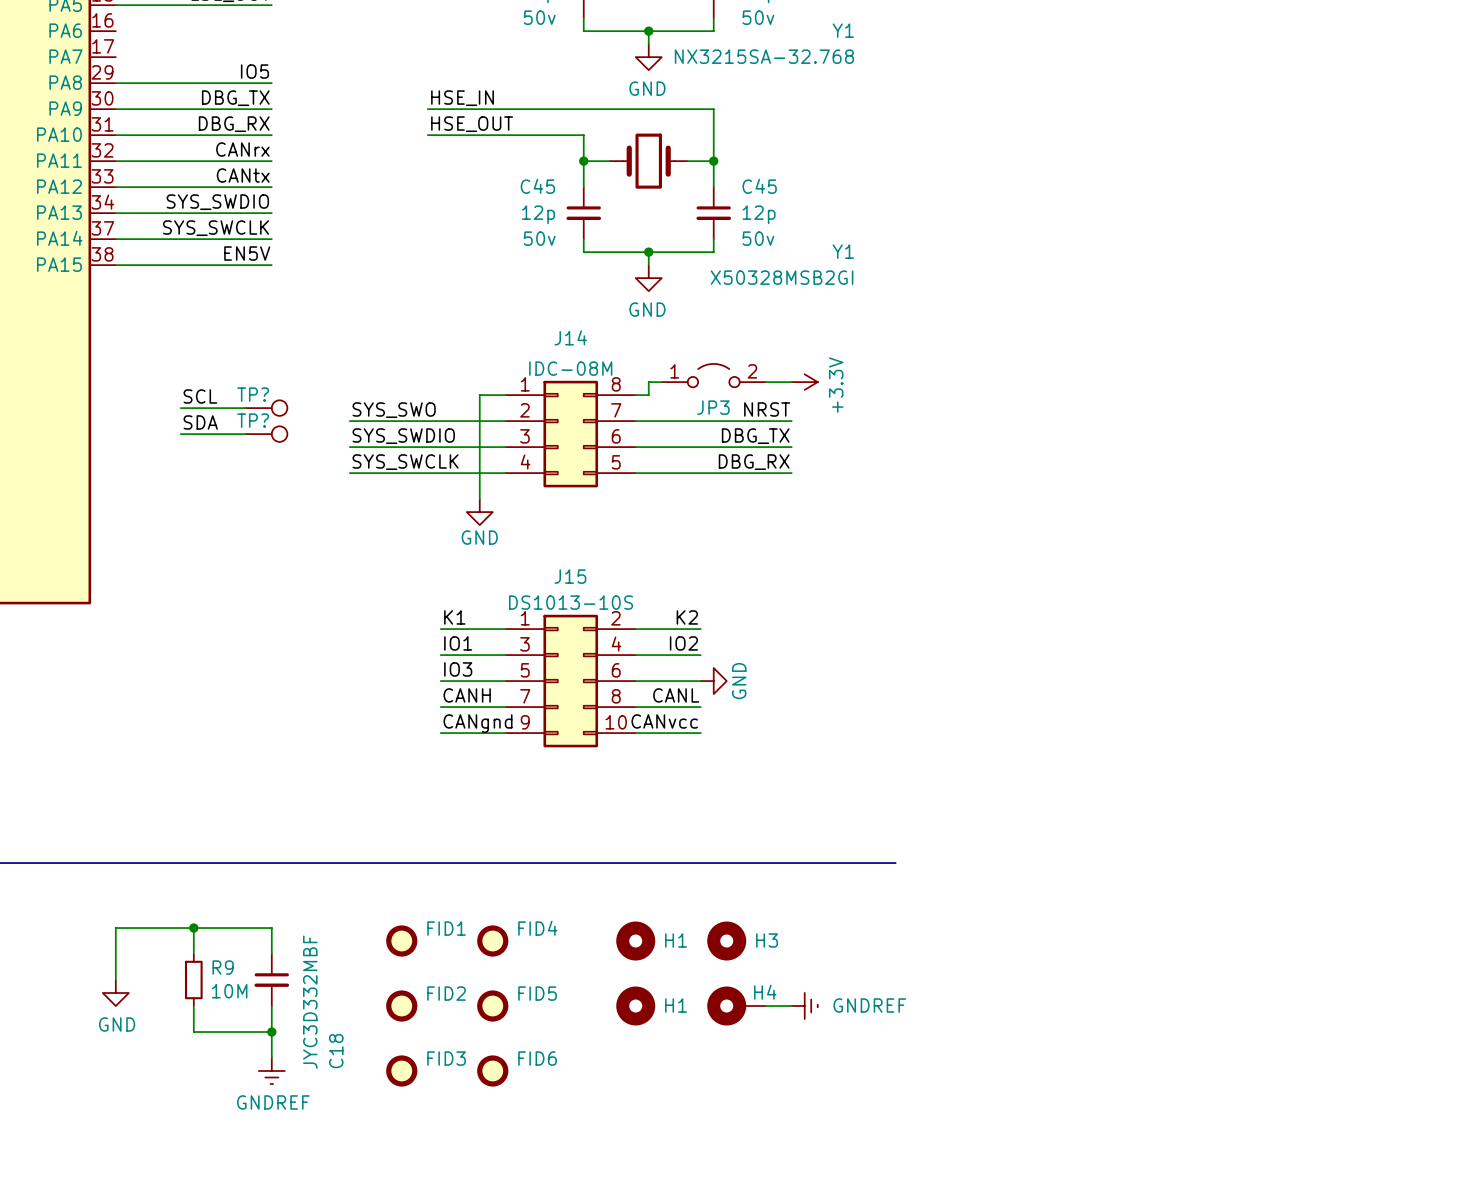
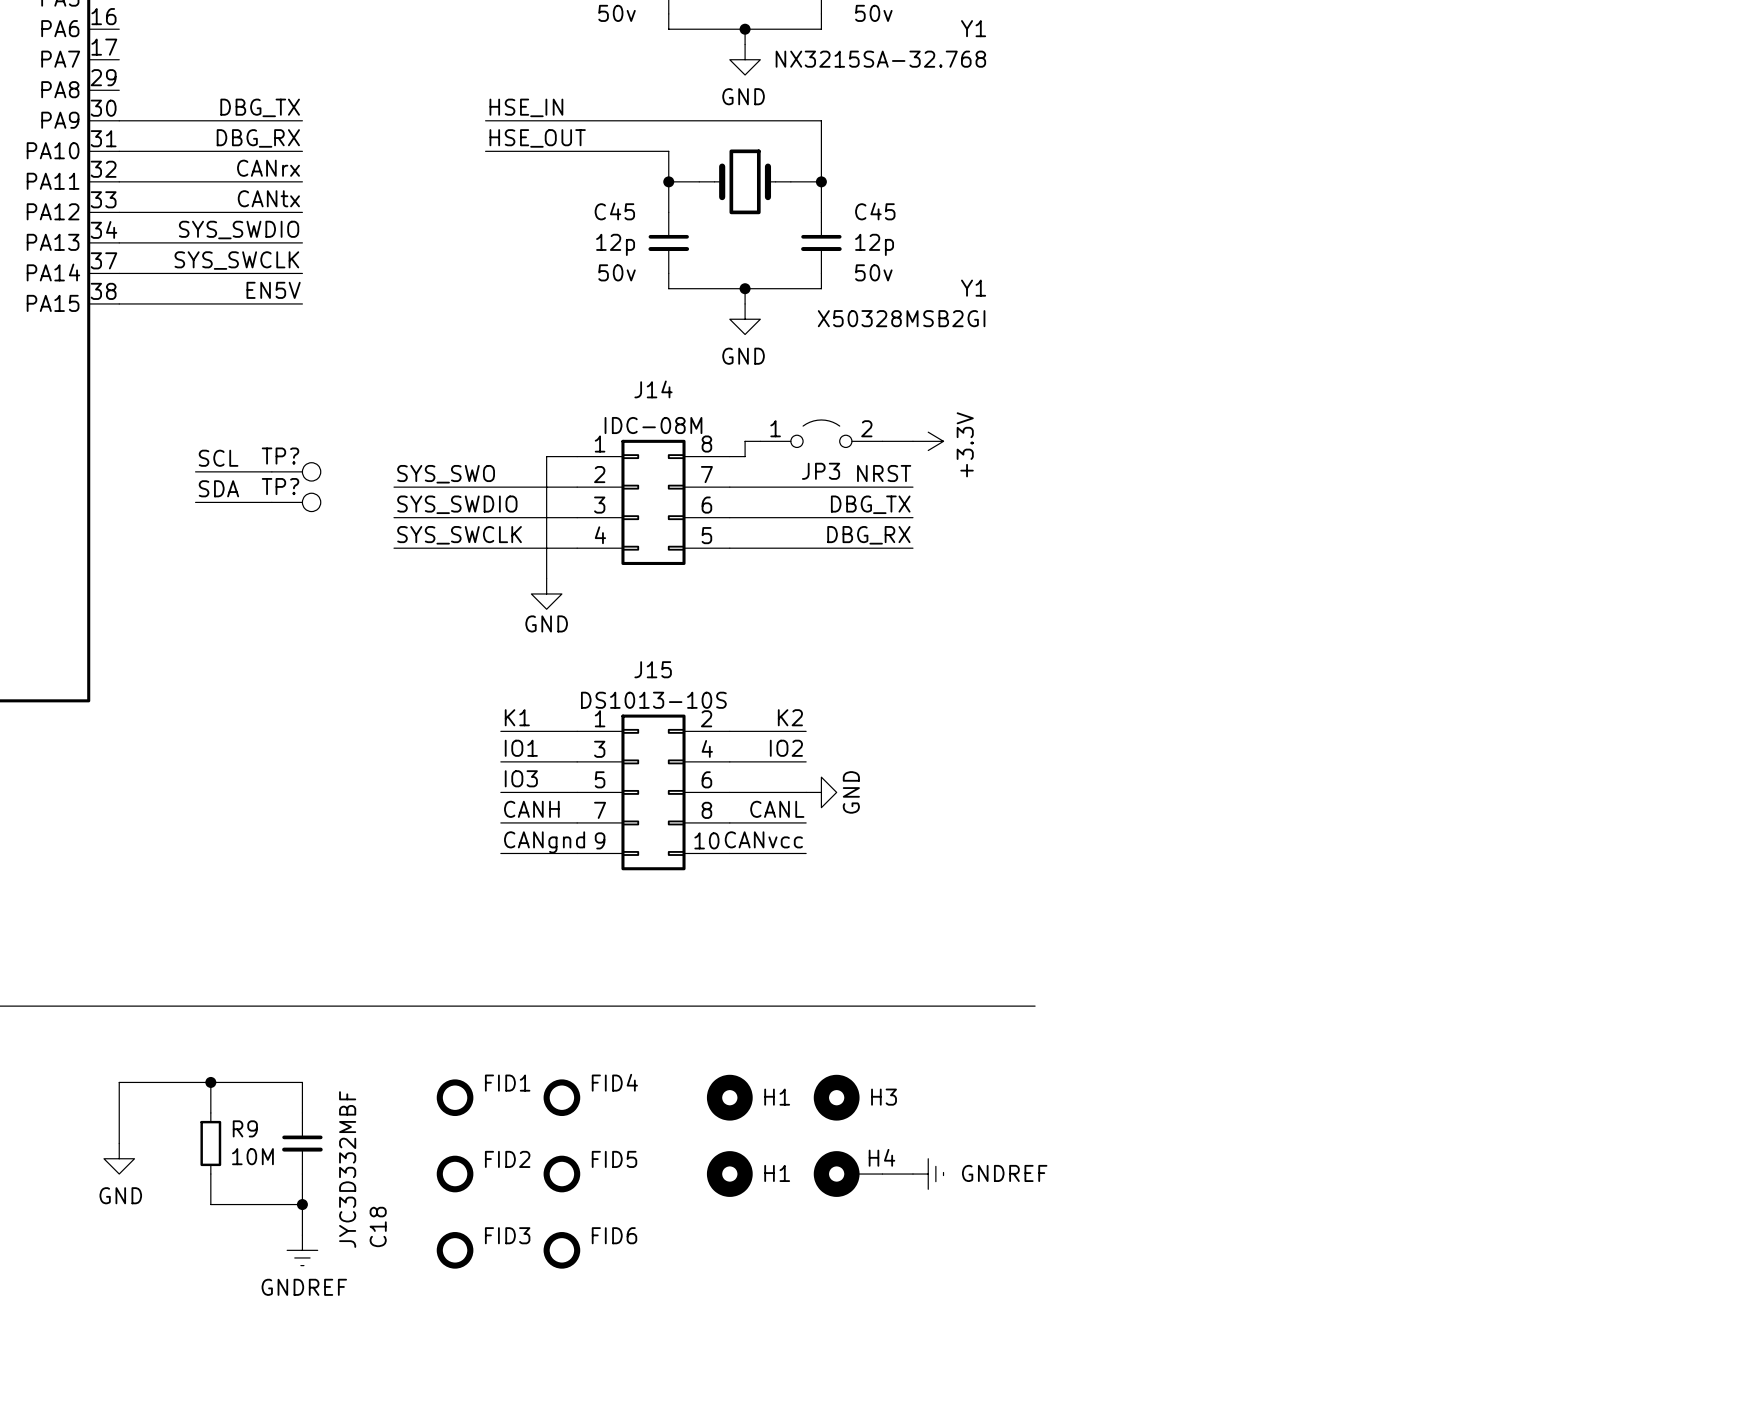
label: IO5 (254, 71) -> none
wire: (115, 83) (271, 83) -> none

